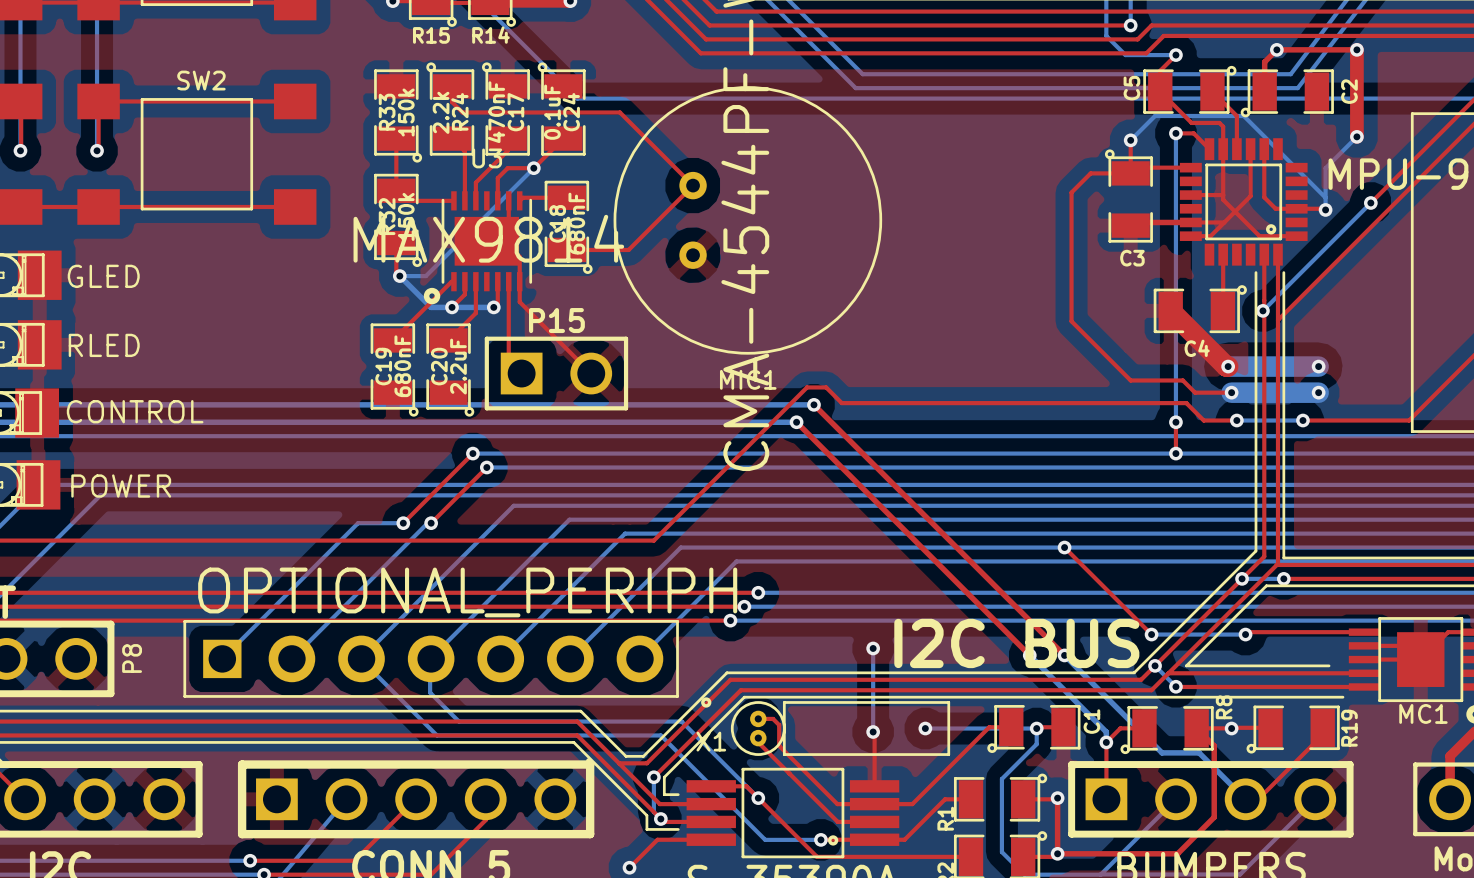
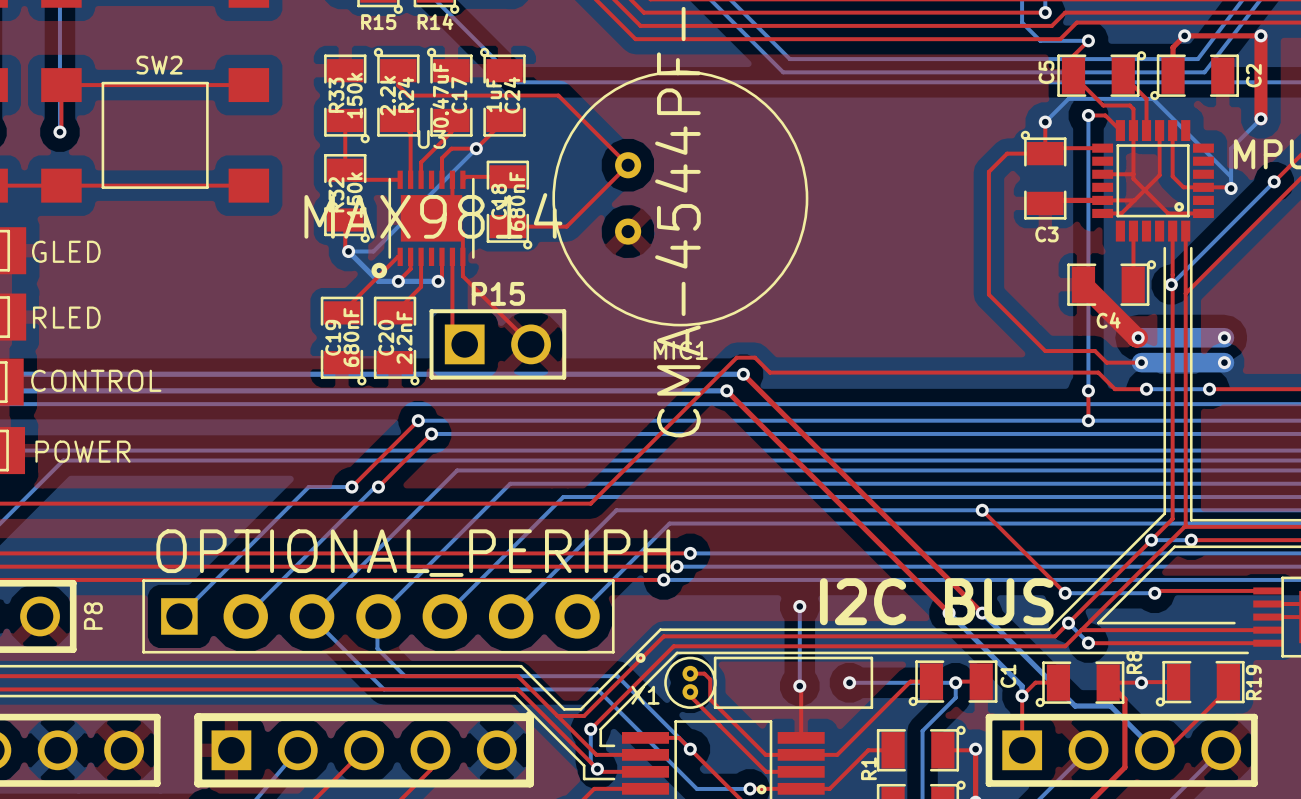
C17 value: 470nF (496, 112) -> 0.47uF (440, 95)
C24 value: 0.1uF (552, 112) -> 1uF (494, 95)
C20 value: 2.2uF (458, 366) -> 2.2nF (404, 337)

